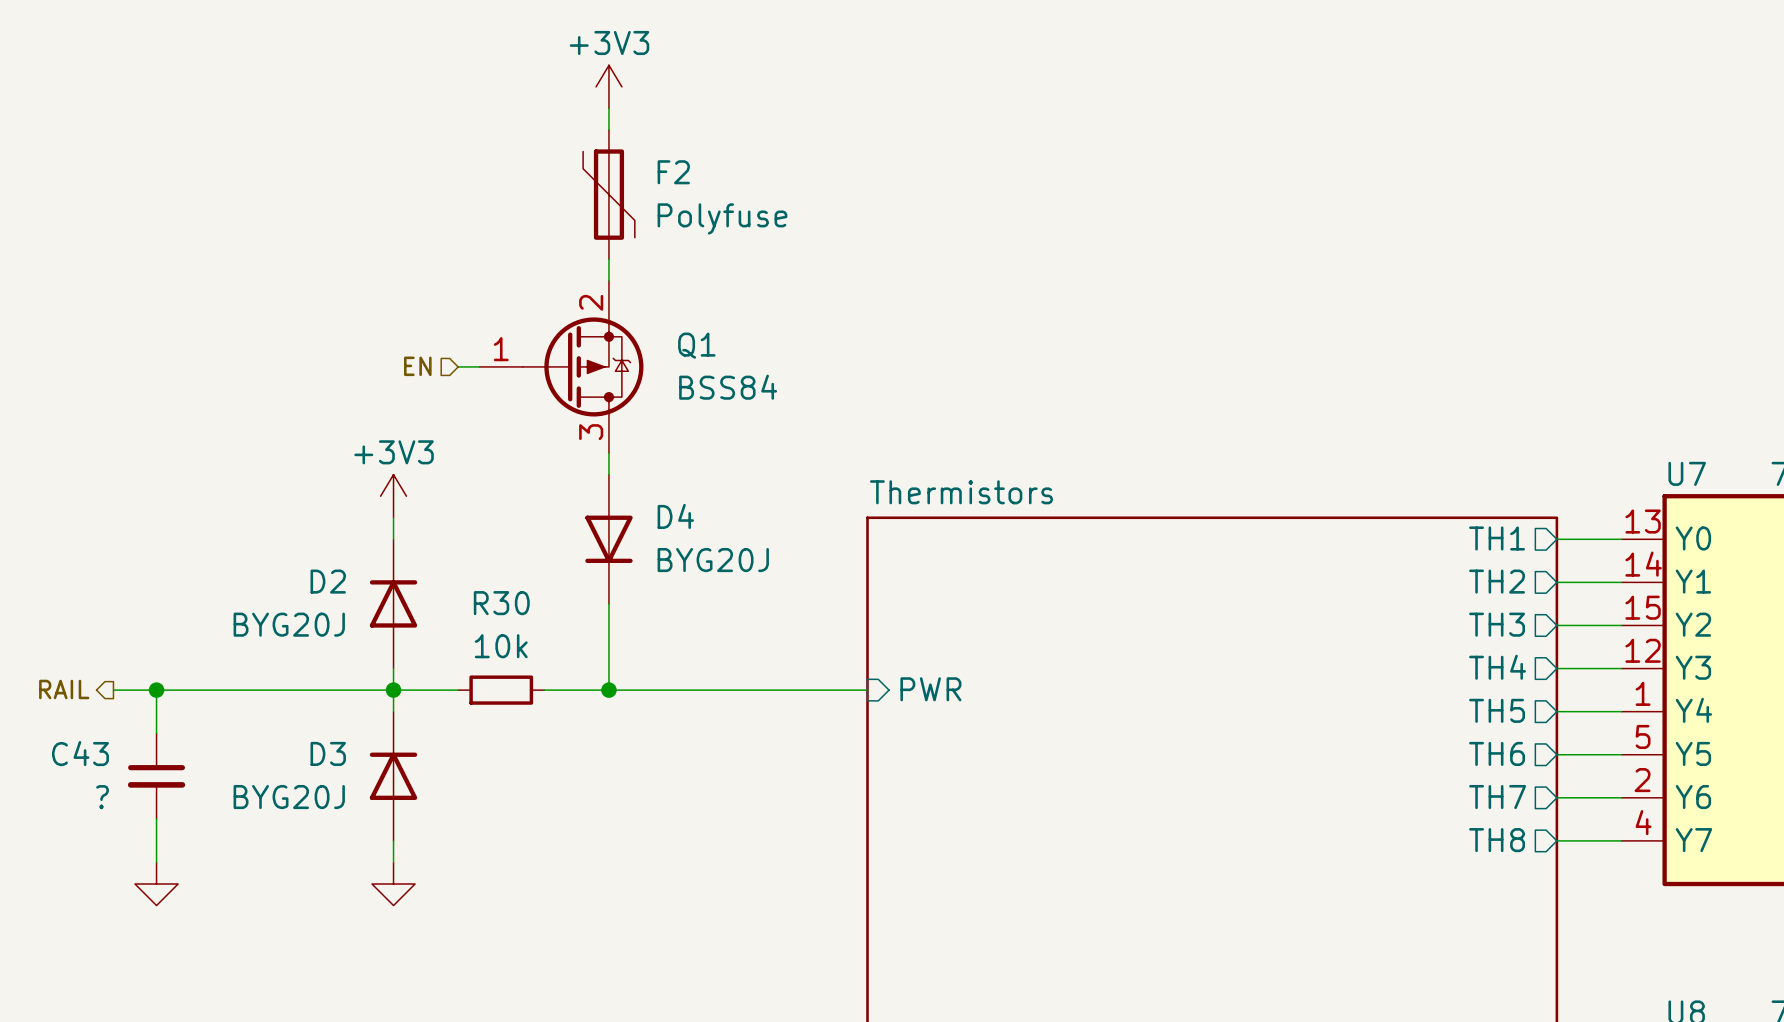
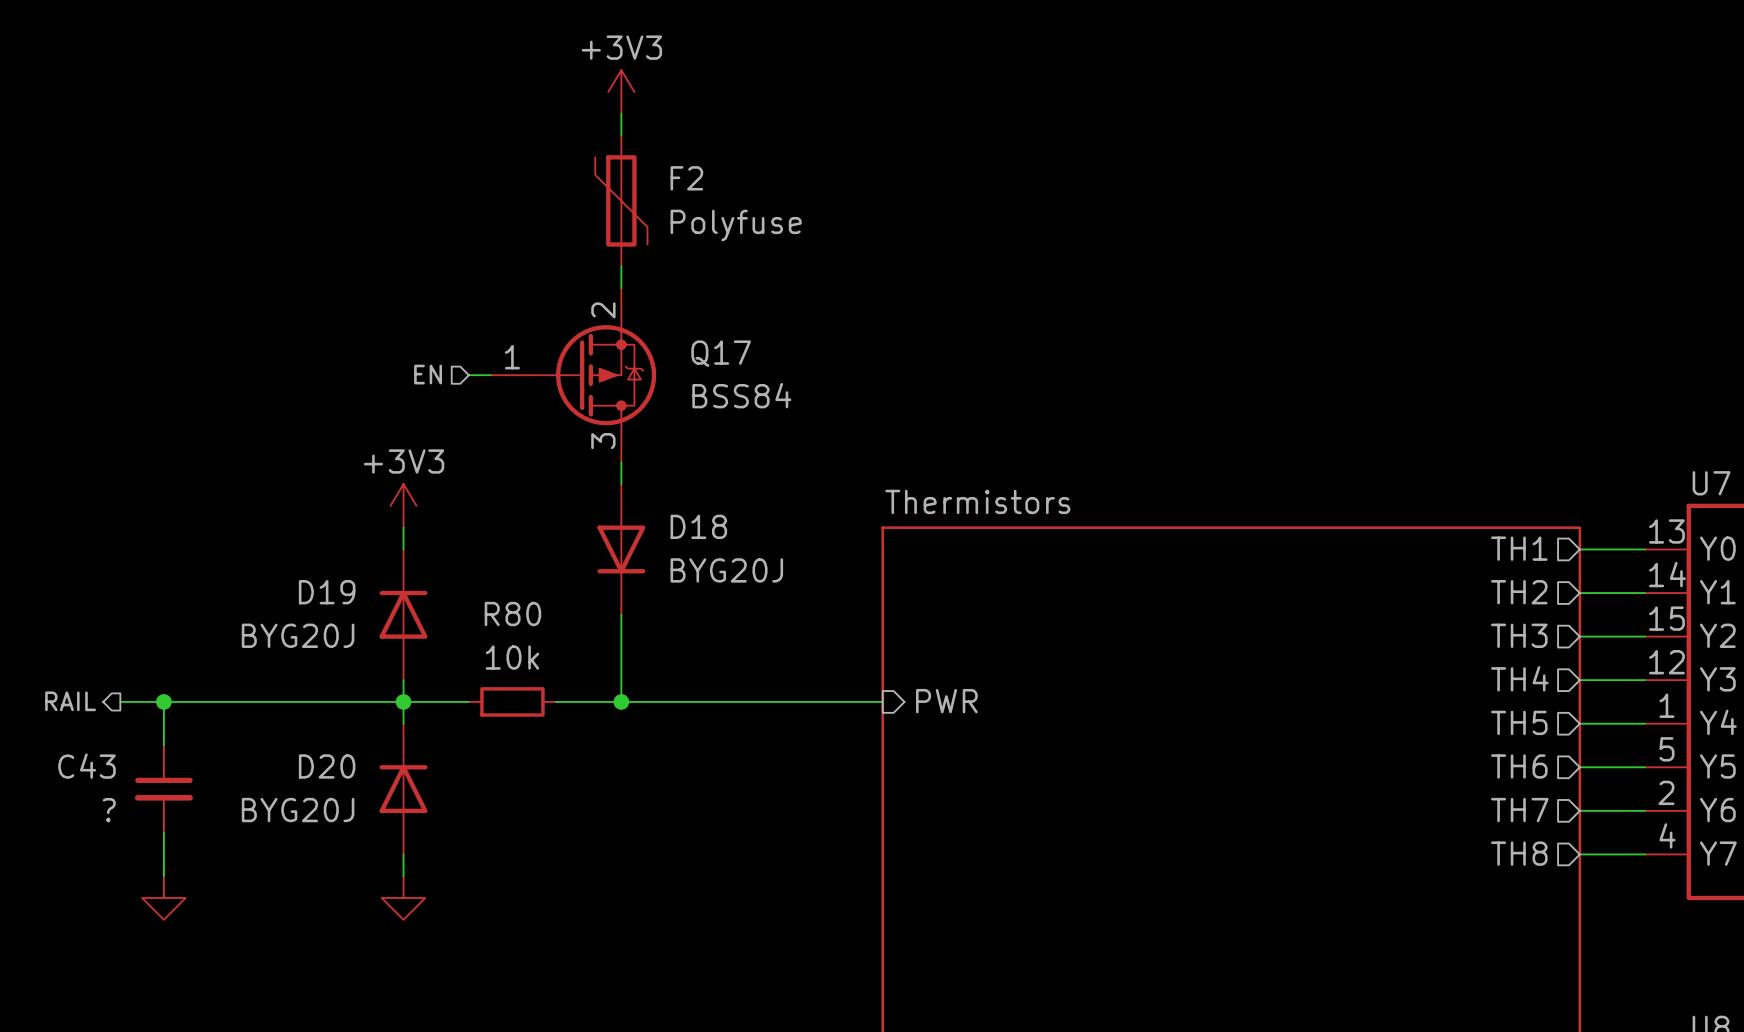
Q1 name: Q1 (696, 345) -> Q17 (721, 353)
D4 name: D4 (675, 516) -> D18 (698, 526)
D2 name: D2 (328, 581) -> D19 (327, 592)
R30 name: R30 (501, 603) -> R80 (512, 614)
D3 name: D3 (328, 753) -> D20 (327, 766)

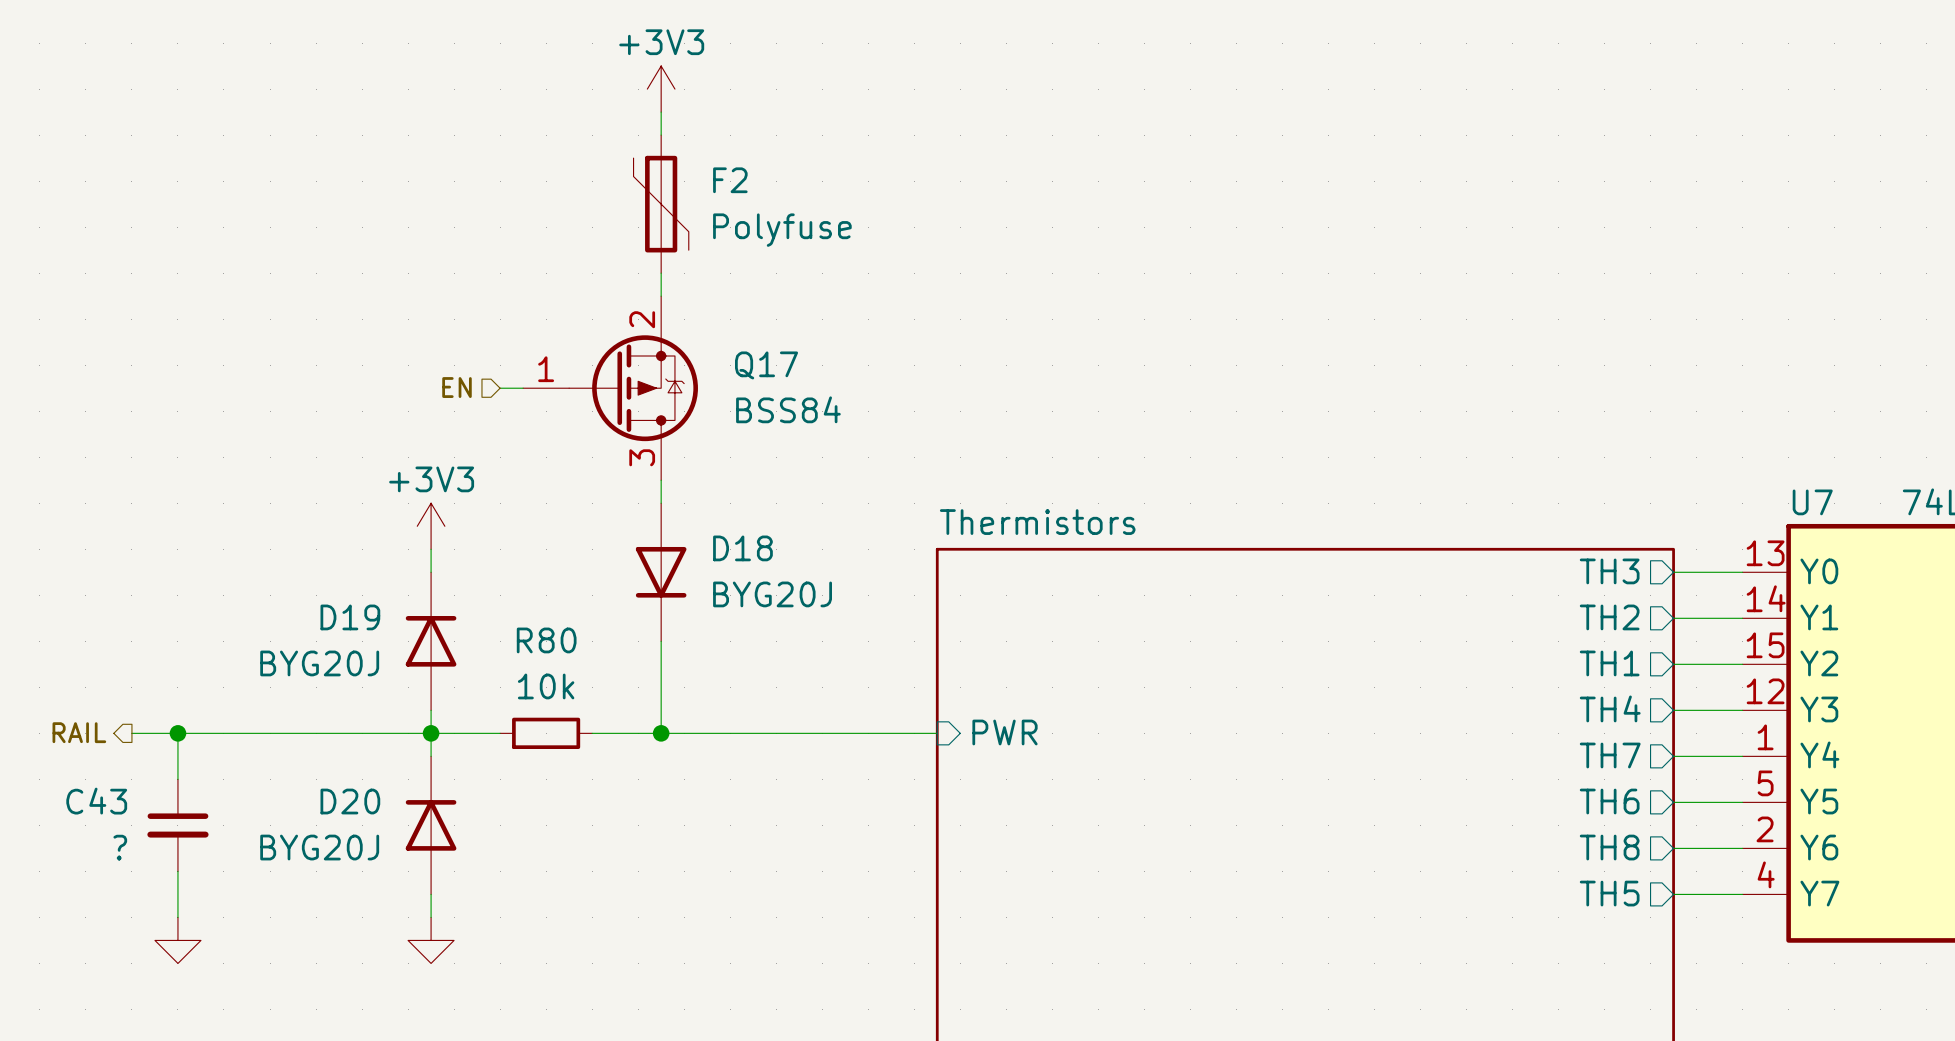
sheet pin: TH1 (1519, 548) -> TH3 (1609, 571)
sheet pin: TH3 (1519, 635) -> TH1 (1609, 663)
sheet pin: TH5 (1519, 722) -> TH7 (1610, 755)
sheet pin: TH7 (1519, 810) -> TH8 (1609, 847)
sheet pin: TH8 (1519, 853) -> TH5 (1609, 893)

